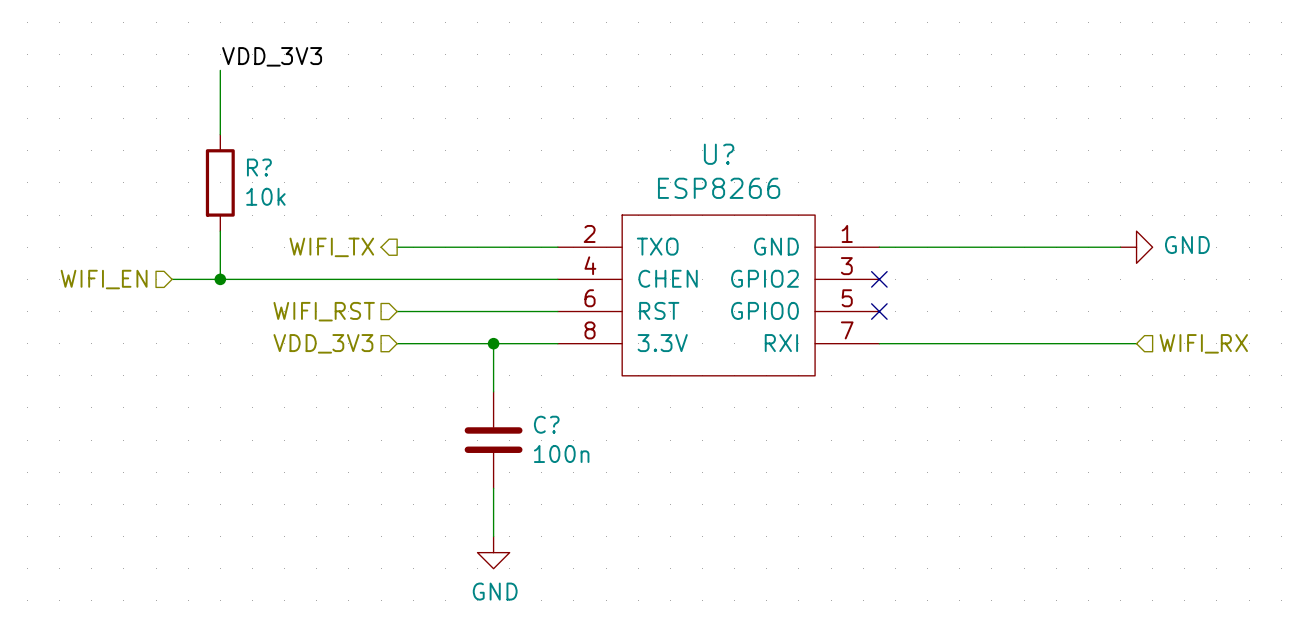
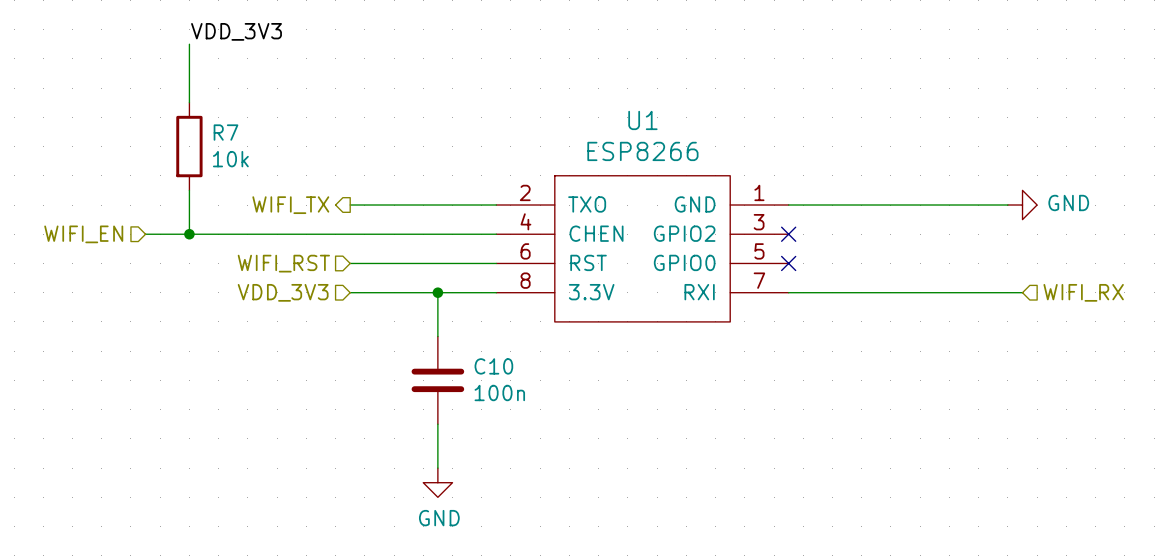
U? name: U? (719, 154) -> U1 (642, 120)
R? name: R? (259, 167) -> R7 (226, 132)
C? name: C? (546, 424) -> C10 (493, 366)

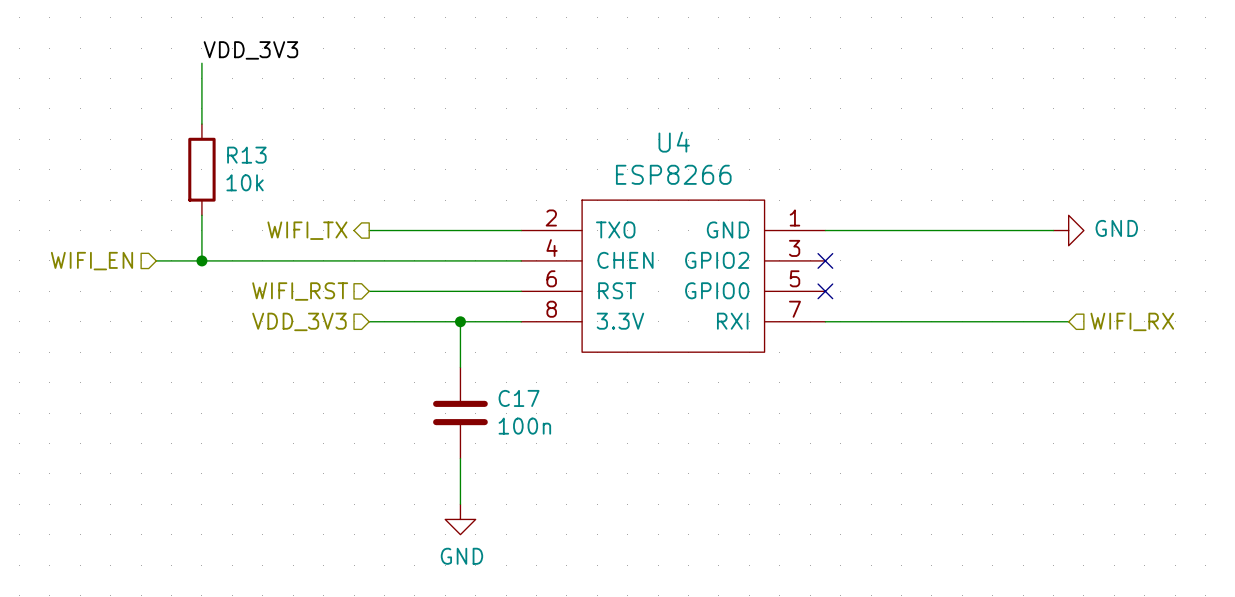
U1 name: U1 (642, 120) -> U4 (674, 142)
R7 name: R7 (226, 132) -> R13 (246, 155)
C10 name: C10 (493, 366) -> C17 (519, 398)

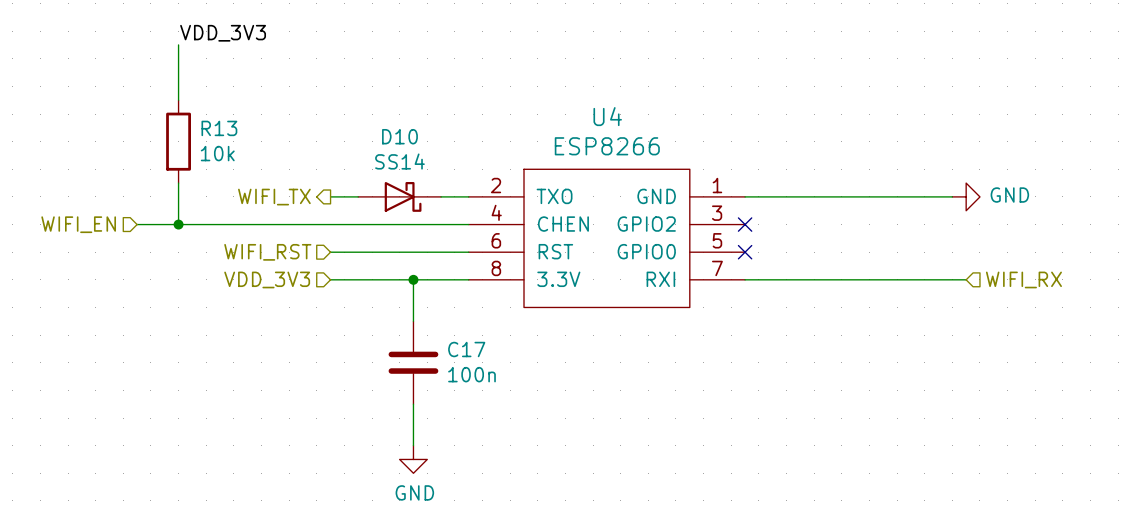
D10: none -> SS14 (399, 196)

